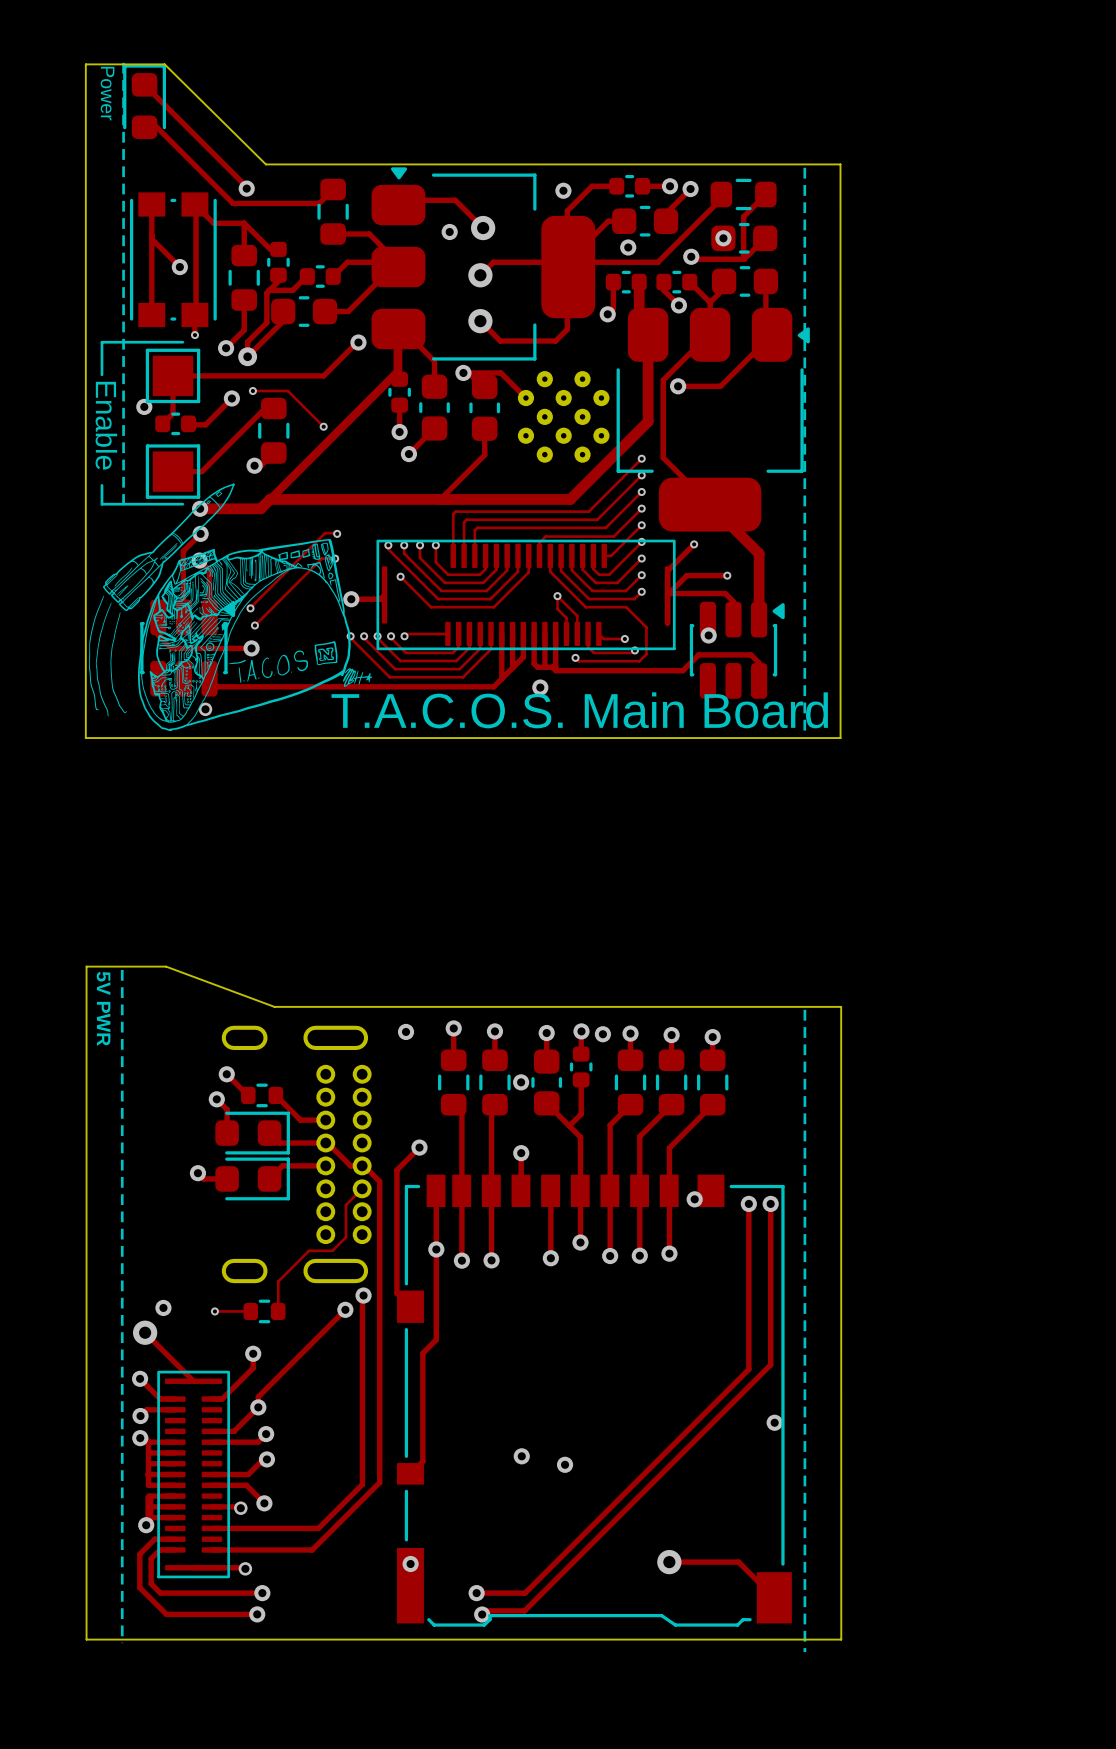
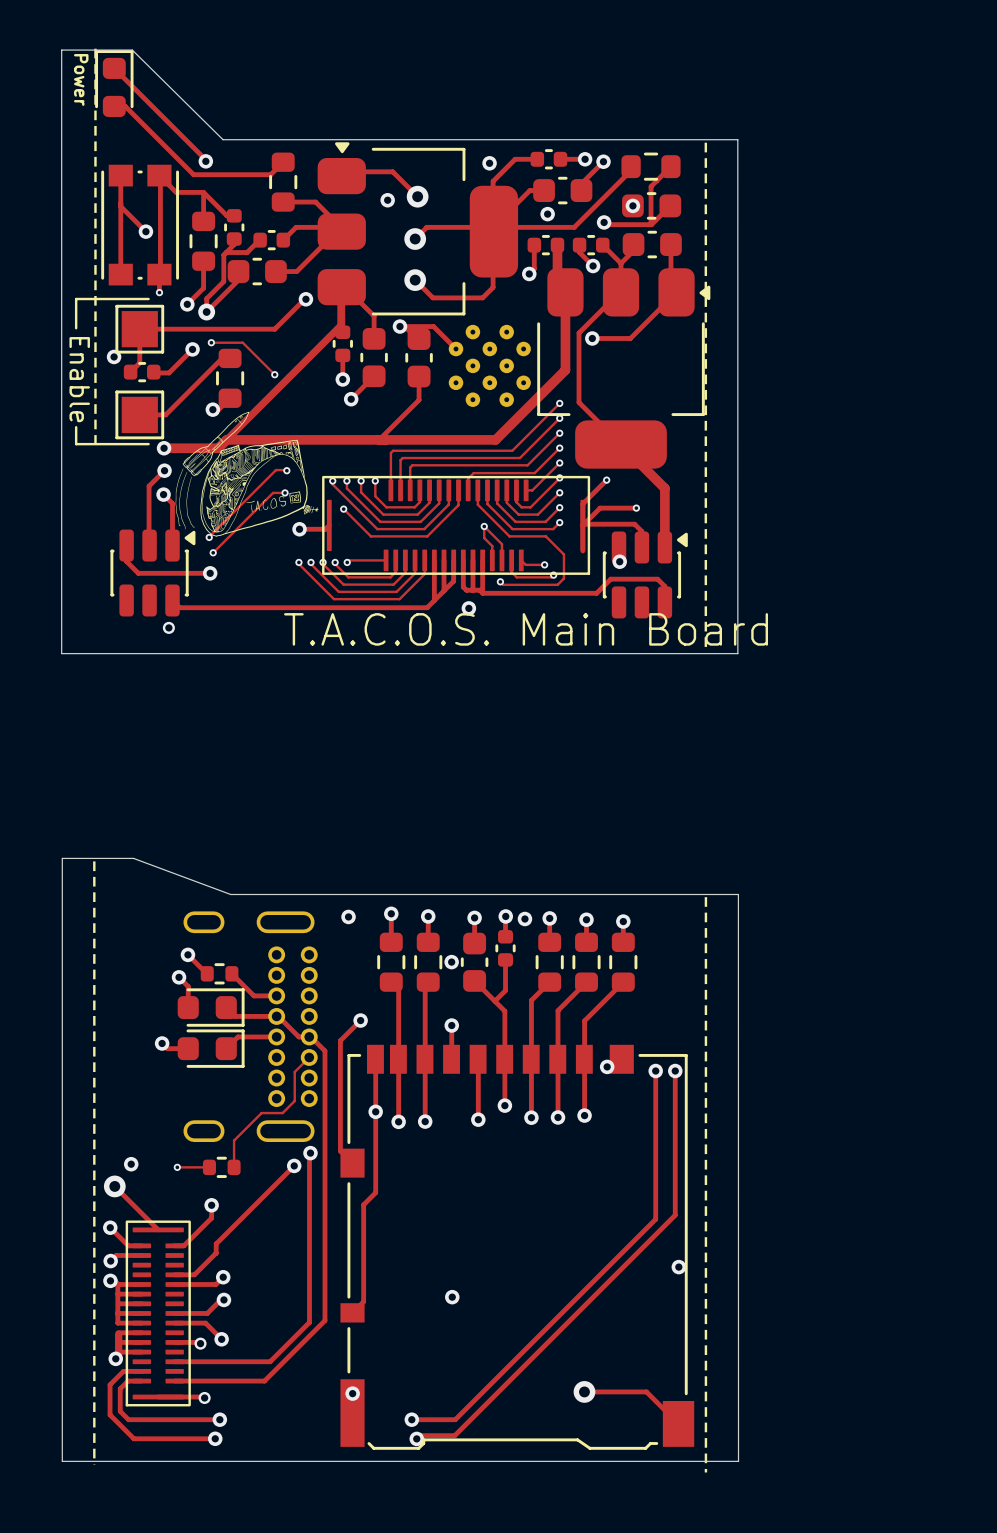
drawing: none -> [175, 411, 319, 537]
drawing: [88, 483, 373, 732] -> none
text: 5V PWR (103, 1008) -> none
via: (258, 1407) -> none
via: (565, 1464) -> none

